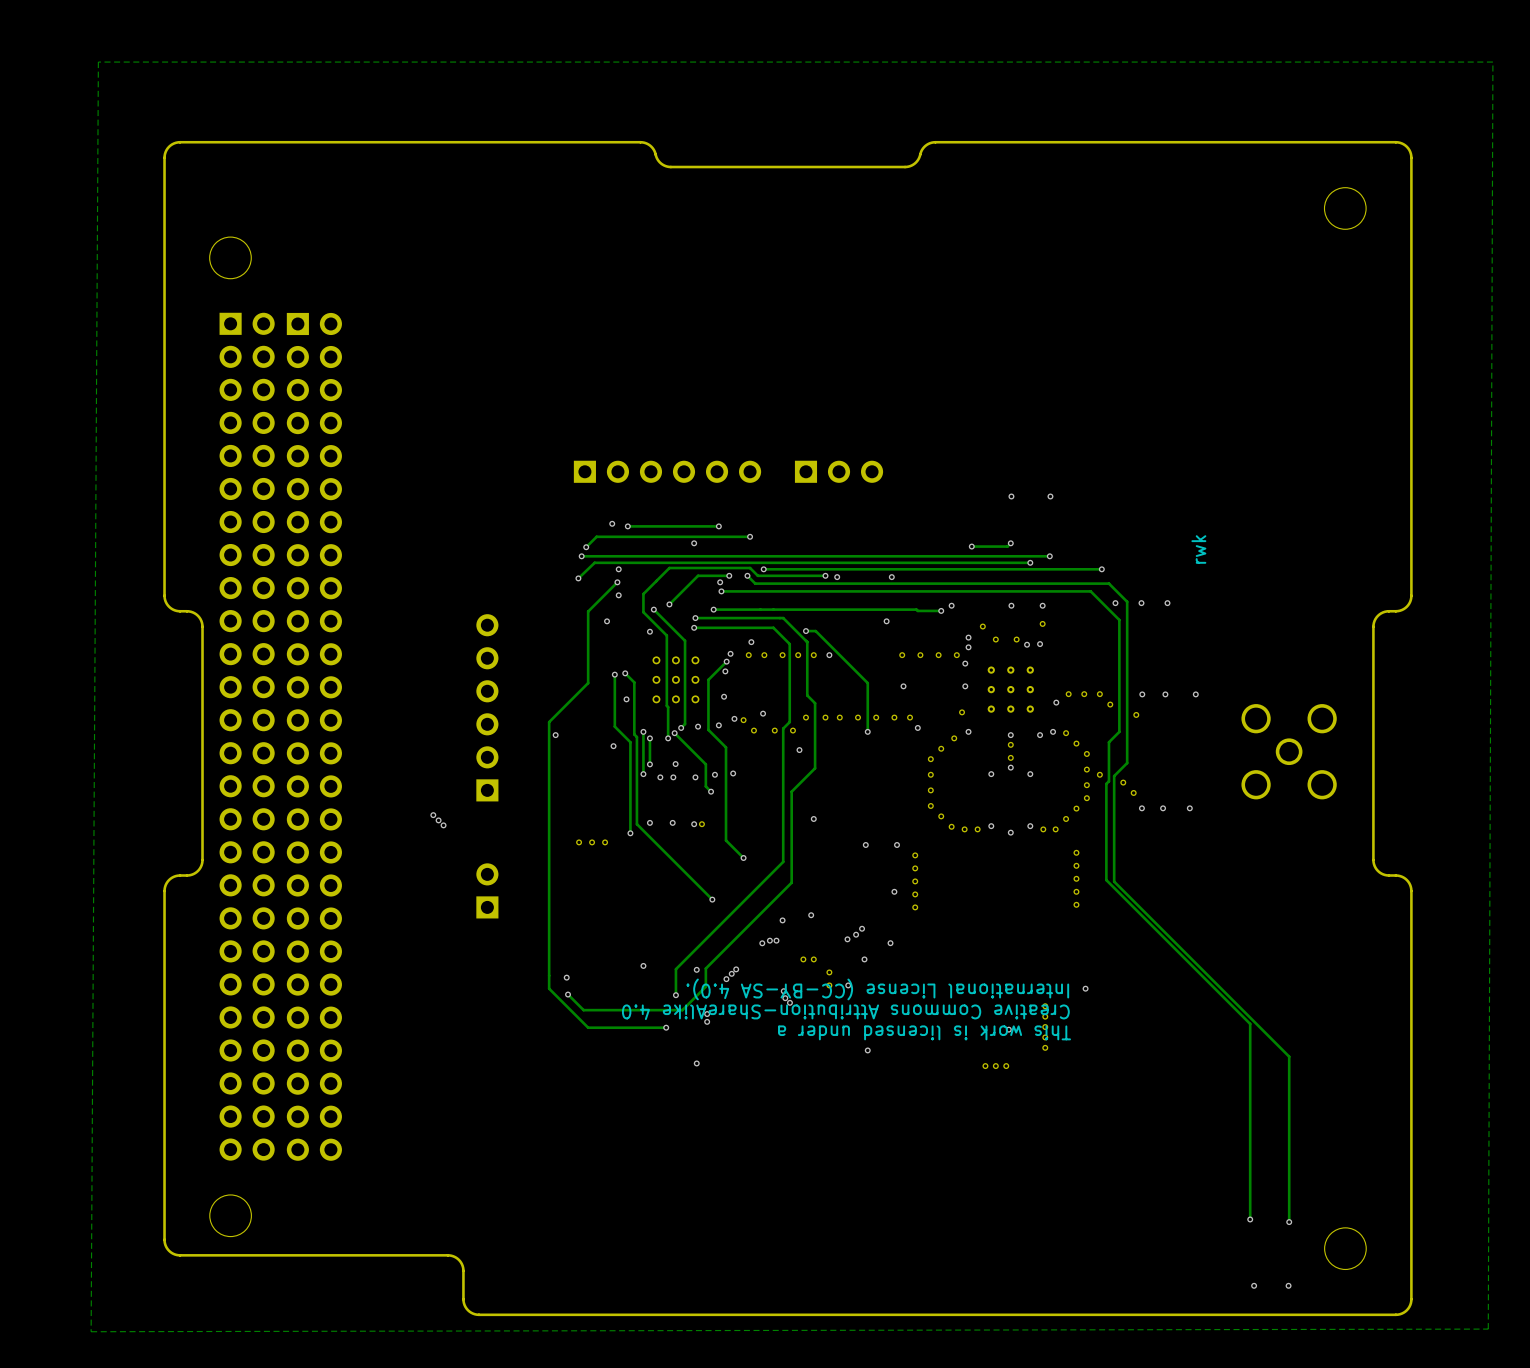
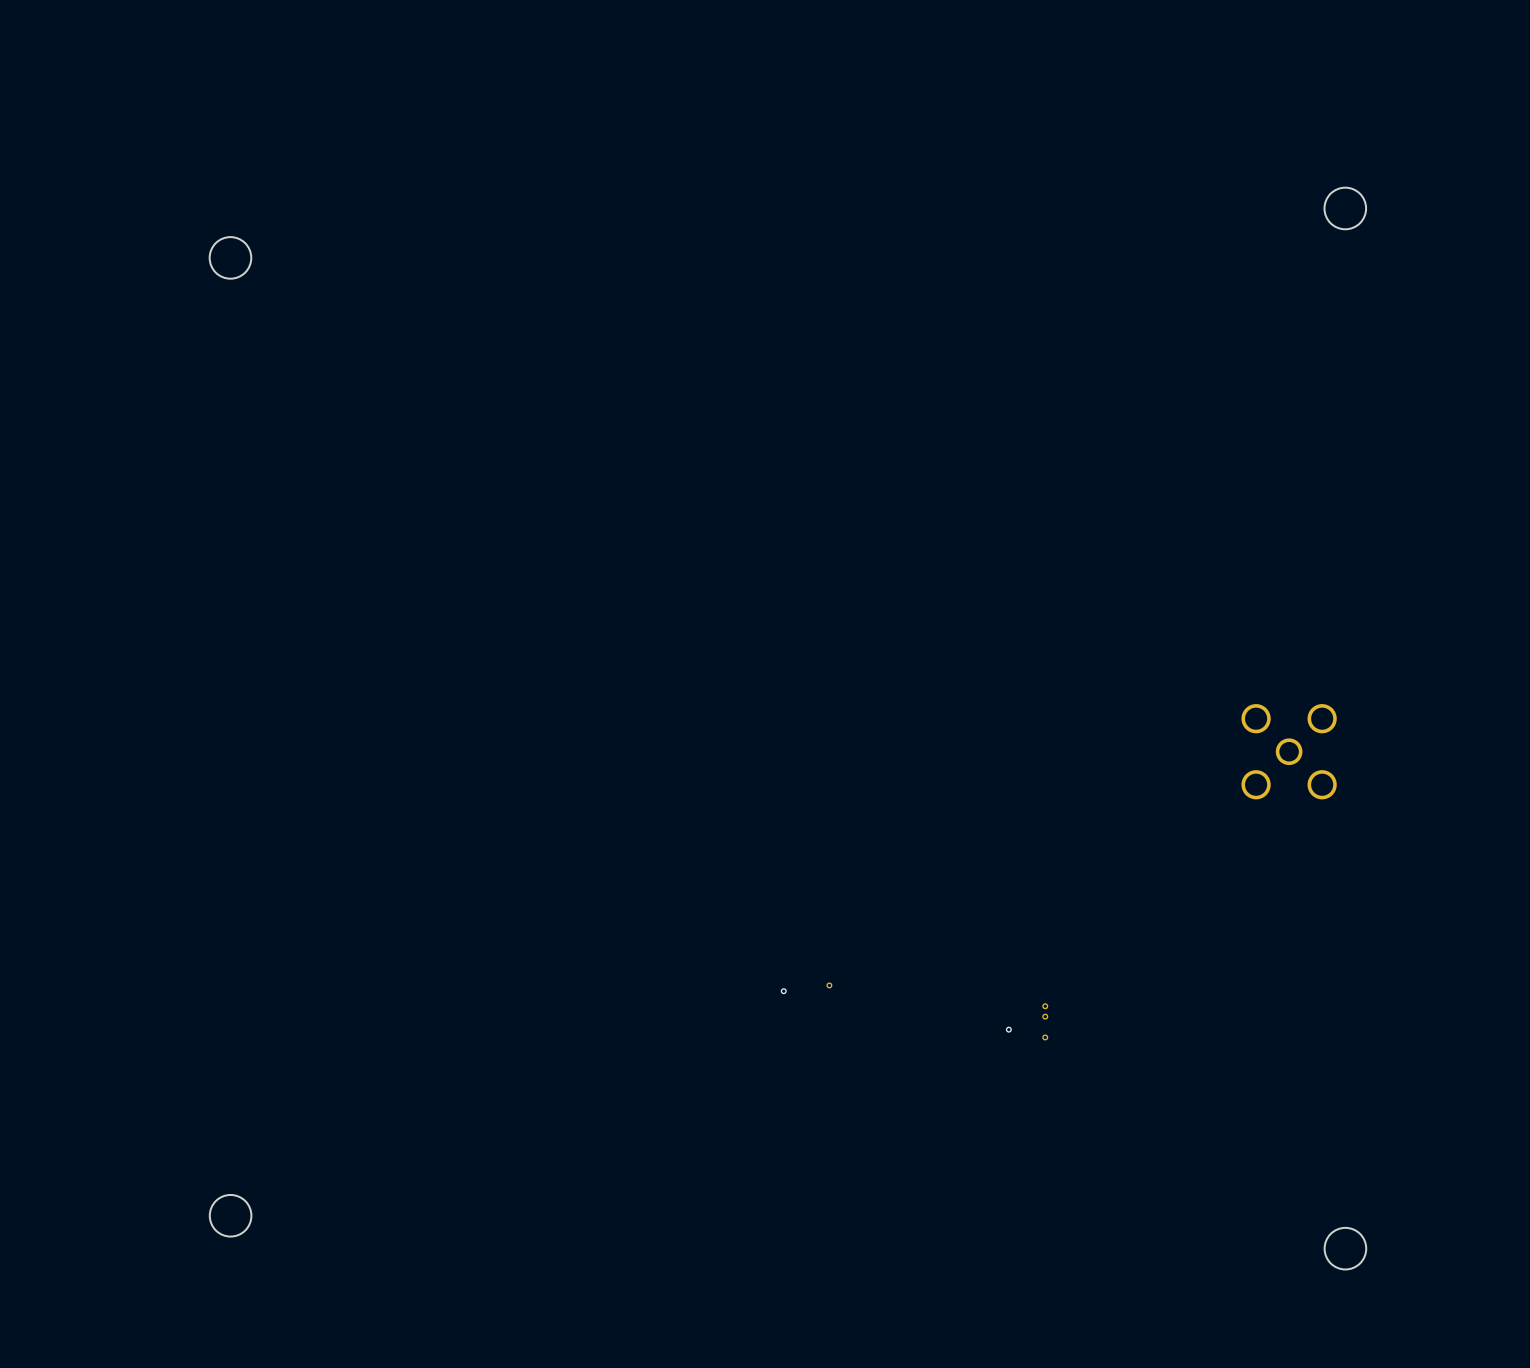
zone outline: (1492, 62) (1488, 1329) (91, 1331) (98, 62) (1492, 62) -> none
board edge: (1395, 142) (935, 142) (925, 145) (916, 162) (905, 167) (669, 166) (659, 162) (650, 145) (640, 142) (180, 142) (169, 146) (164, 157) (164, 595) (166, 602) (170, 607) (176, 610) (194, 613) (200, 619) (202, 624) (202, 859) (200, 866) (196, 872) (190, 875) (172, 877) (166, 883) (164, 889) (164, 1239) (169, 1250) (180, 1255) (451, 1255) (458, 1259) (463, 1267) (464, 1305) (469, 1311) (478, 1314) (1395, 1314) (1406, 1310) (1411, 1299) (1411, 889) (1409, 883) (1403, 877) (1379, 872) (1375, 867) (1373, 859) (1373, 624) (1376, 617) (1381, 613) (1405, 608) (1410, 601) (1411, 595) (1411, 157) (1406, 146) (1395, 142) -> none
part: (667, 471) -> none
part: (839, 471) -> none
via: (1011, 496) -> none
via: (1050, 496) -> none
via: (612, 523) -> none
via: (627, 526) -> none
track: (718, 526) (627, 526) -> none
via: (718, 526) -> none
track: (750, 536) (596, 536) (586, 547) -> none
via: (750, 536) -> none
via: (694, 543) -> none
track: (1010, 543) (1007, 546) (971, 546) -> none
via: (1010, 543) -> none
via: (971, 546) -> none
via: (586, 547) -> none
text: rwk (1198, 549) -> none
via: (581, 556) -> none
track: (1049, 556) (581, 556) -> none
via: (1049, 556) -> none
track: (1030, 562) (594, 562) (578, 578) -> none
via: (1030, 562) -> none
via: (618, 569) -> none
via: (763, 569) -> none
track: (1101, 569) (763, 569) -> none
via: (1101, 569) -> none
track: (729, 575) (698, 575) (669, 604) -> none
via: (729, 575) -> none
track: (747, 575) (755, 583) (1108, 583) (1127, 601) (1127, 763) (1114, 776) (1114, 881) (1289, 1056) (1289, 1222) -> none
via: (747, 575) -> none
track: (825, 575) (757, 575) (750, 568) (669, 568) (643, 594) (643, 612) (666, 635) (668, 738) -> none
via: (825, 575) -> none
via: (837, 577) -> none
via: (891, 577) -> none
via: (578, 578) -> none
track: (617, 582) (588, 611) (588, 683) (549, 722) (549, 988) (588, 1027) (666, 1027) -> none
via: (617, 582) -> none
via: (720, 582) -> none
track: (721, 591) (1090, 591) (1119, 620) (1119, 731) (1108, 742) (1108, 781) (1106, 783) (1106, 880) (1250, 1023) (1250, 1219) -> none
via: (721, 591) -> none
via: (618, 595) -> none
via: (1115, 603) -> none
via: (1141, 603) -> none
via: (1167, 603) -> none
via: (669, 604) -> none
via: (951, 605) -> none
via: (1011, 605) -> none
via: (1042, 605) -> none
track: (653, 609) (685, 640) (685, 724) (681, 727) -> none
via: (653, 609) -> none
track: (713, 609) (941, 610) -> none
via: (713, 609) -> none
via: (941, 610) -> none
track: (695, 618) (783, 618) (807, 642) (807, 695) (815, 703) (815, 768) (791, 791) (791, 882) (705, 968) (705, 986) (682, 1010) (583, 1010) (568, 994) -> none
via: (695, 618) -> none
via: (607, 621) -> none
via: (886, 621) -> none
part: (1042, 623) -> none
part: (982, 626) -> none
track: (694, 627) (773, 627) (789, 644) (789, 722) (783, 728) (783, 861) (675, 969) (675, 995) -> none
via: (694, 627) -> none
via: (649, 631) -> none
track: (805, 631) (815, 631) (867, 683) (867, 731) -> none
via: (805, 631) -> none
via: (968, 637) -> none
part: (995, 639) -> none
part: (1016, 639) -> none
via: (751, 642) -> none
via: (1027, 644) -> none
via: (1040, 644) -> none
via: (968, 647) -> none
via: (730, 653) -> none
part: (748, 655) -> none
part: (764, 655) -> none
part: (782, 655) -> none
part: (798, 655) -> none
part: (813, 655) -> none
via: (829, 655) -> none
part: (902, 655) -> none
part: (920, 655) -> none
part: (938, 655) -> none
part: (956, 655) -> none
track: (726, 661) (708, 679) (708, 729) (726, 747) (726, 840) (743, 858) -> none
via: (726, 661) -> none
via: (965, 663) -> none
via: (725, 671) -> none
track: (625, 673) (634, 682) (634, 734) (636, 737) (636, 824) (712, 899) -> none
via: (625, 673) -> none
track: (614, 674) (614, 726) (630, 742) (630, 833) -> none
via: (614, 674) -> none
part: (675, 679) -> none
via: (903, 686) -> none
via: (965, 686) -> none
part: (1010, 689) -> none
part: (1068, 694) -> none
part: (1084, 694) -> none
part: (1099, 694) -> none
via: (1142, 694) -> none
via: (1165, 694) -> none
via: (1195, 694) -> none
via: (724, 696) -> none
via: (626, 699) -> none
via: (1056, 702) -> none
part: (1110, 704) -> none
part: (487, 707) -> none
part: (962, 712) -> none
via: (763, 713) -> none
part: (1136, 714) -> none
part: (805, 717) -> none
part: (825, 717) -> none
part: (839, 717) -> none
part: (858, 717) -> none
part: (876, 717) -> none
part: (894, 717) -> none
part: (910, 717) -> none
via: (734, 718) -> none
part: (743, 720) -> none
via: (718, 725) -> none
via: (698, 726) -> none
via: (681, 727) -> none
via: (917, 727) -> none
part: (753, 730) -> none
part: (774, 730) -> none
part: (792, 730) -> none
track: (643, 731) (643, 774) -> none
via: (643, 731) -> none
via: (867, 731) -> none
via: (968, 731) -> none
via: (1053, 731) -> none
track: (674, 733) (705, 764) (705, 786) (711, 791) -> none
via: (674, 733) -> none
part: (1066, 733) -> none
via: (555, 735) -> none
via: (1010, 735) -> none
via: (1040, 735) -> none
part: (247, 736) -> none
part: (314, 736) -> none
track: (649, 738) (649, 764) -> none
via: (649, 738) -> none
via: (668, 738) -> none
part: (954, 738) -> none
part: (1076, 743) -> none
part: (1010, 744) -> none
via: (613, 746) -> none
part: (941, 748) -> none
via: (799, 750) -> none
part: (1086, 753) -> none
part: (1010, 757) -> none
part: (930, 759) -> none
via: (649, 764) -> none
via: (675, 764) -> none
via: (1010, 767) -> none
part: (1086, 769) -> none
via: (733, 773) -> none
via: (643, 774) -> none
via: (714, 774) -> none
part: (930, 774) -> none
via: (991, 774) -> none
via: (1030, 774) -> none
part: (1099, 774) -> none
via: (660, 777) -> none
via: (673, 777) -> none
via: (695, 777) -> none
part: (1123, 782) -> none
part: (1086, 785) -> none
part: (930, 790) -> none
via: (711, 791) -> none
part: (1133, 792) -> none
part: (1086, 798) -> none
part: (930, 805) -> none
part: (1076, 808) -> none
via: (1141, 808) -> none
via: (1163, 808) -> none
via: (1189, 808) -> none
via: (433, 815) -> none
part: (941, 816) -> none
via: (813, 818) -> none
part: (1066, 818) -> none
via: (438, 820) -> none
via: (649, 822) -> none
via: (672, 822) -> none
via: (694, 824) -> none
part: (701, 824) -> none
via: (443, 825) -> none
part: (951, 826) -> none
via: (991, 826) -> none
via: (1030, 826) -> none
part: (964, 829) -> none
part: (977, 829) -> none
part: (1043, 829) -> none
part: (1055, 829) -> none
via: (1010, 832) -> none
via: (630, 833) -> none
part: (579, 842) -> none
part: (592, 842) -> none
part: (605, 842) -> none
via: (865, 845) -> none
via: (897, 845) -> none
part: (1076, 852) -> none
part: (915, 855) -> none
via: (743, 858) -> none
part: (1076, 865) -> none
part: (915, 868) -> none
part: (1076, 878) -> none
part: (915, 881) -> none
part: (487, 890) -> none
via: (894, 891) -> none
part: (1076, 891) -> none
part: (915, 894) -> none
via: (712, 899) -> none
part: (1076, 904) -> none
part: (915, 907) -> none
via: (811, 915) -> none
via: (782, 920) -> none
via: (862, 928) -> none
via: (856, 934) -> none
via: (847, 939) -> none
via: (769, 940) -> none
via: (776, 940) -> none
via: (762, 943) -> none
via: (890, 943) -> none
part: (803, 959) -> none
part: (813, 959) -> none
via: (864, 959) -> none
via: (643, 965) -> none
via: (696, 969) -> none
via: (736, 969) -> none
part: (829, 972) -> none
via: (731, 973) -> none
via: (566, 977) -> none
via: (726, 979) -> none
via: (848, 985) -> none
via: (1085, 988) -> none
text: International License (CC-BY-SA 4.0). (877, 989) -> none
via: (568, 994) -> none
via: (675, 995) -> none
via: (785, 998) -> none
via: (789, 1002) -> none
text: Creative Commons Attribution-ShareAlike 4.0 (845, 1012) -> none
via: (707, 1014) -> none
via: (707, 1021) -> none
via: (666, 1027) -> none
part: (1045, 1027) -> none
text: This work is licensed under a (924, 1032) -> none
part: (1045, 1047) -> none
via: (867, 1050) -> none
via: (696, 1063) -> none
part: (985, 1066) -> none
part: (995, 1066) -> none
part: (1006, 1066) -> none
via: (1250, 1219) -> none
via: (1289, 1222) -> none
via: (1254, 1285) -> none
via: (1288, 1285) -> none

